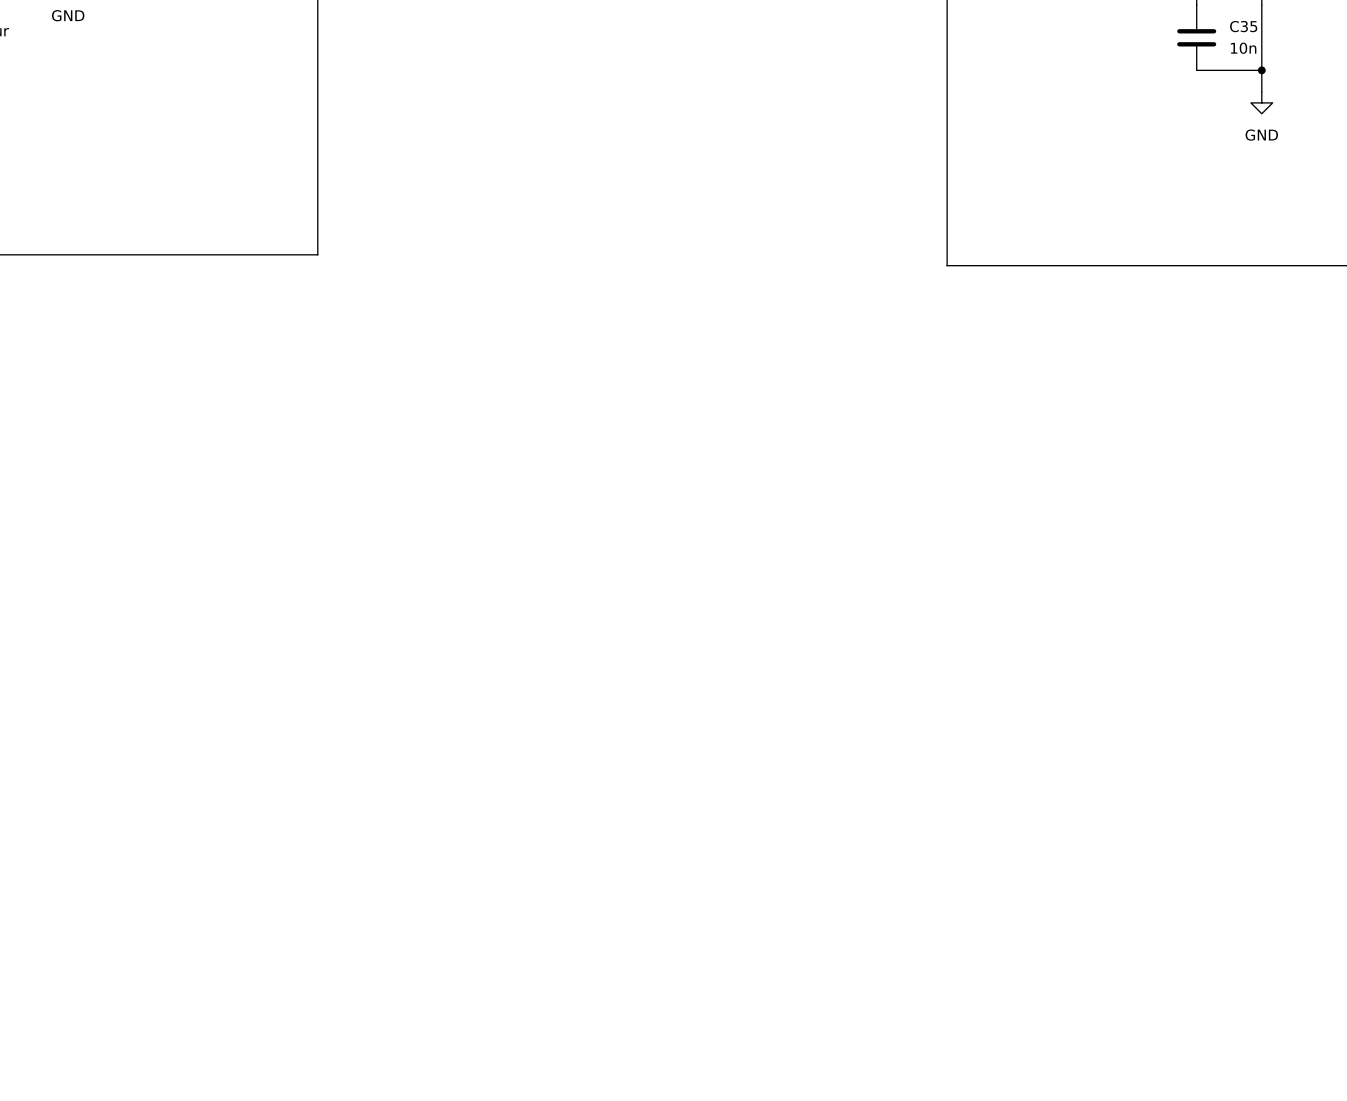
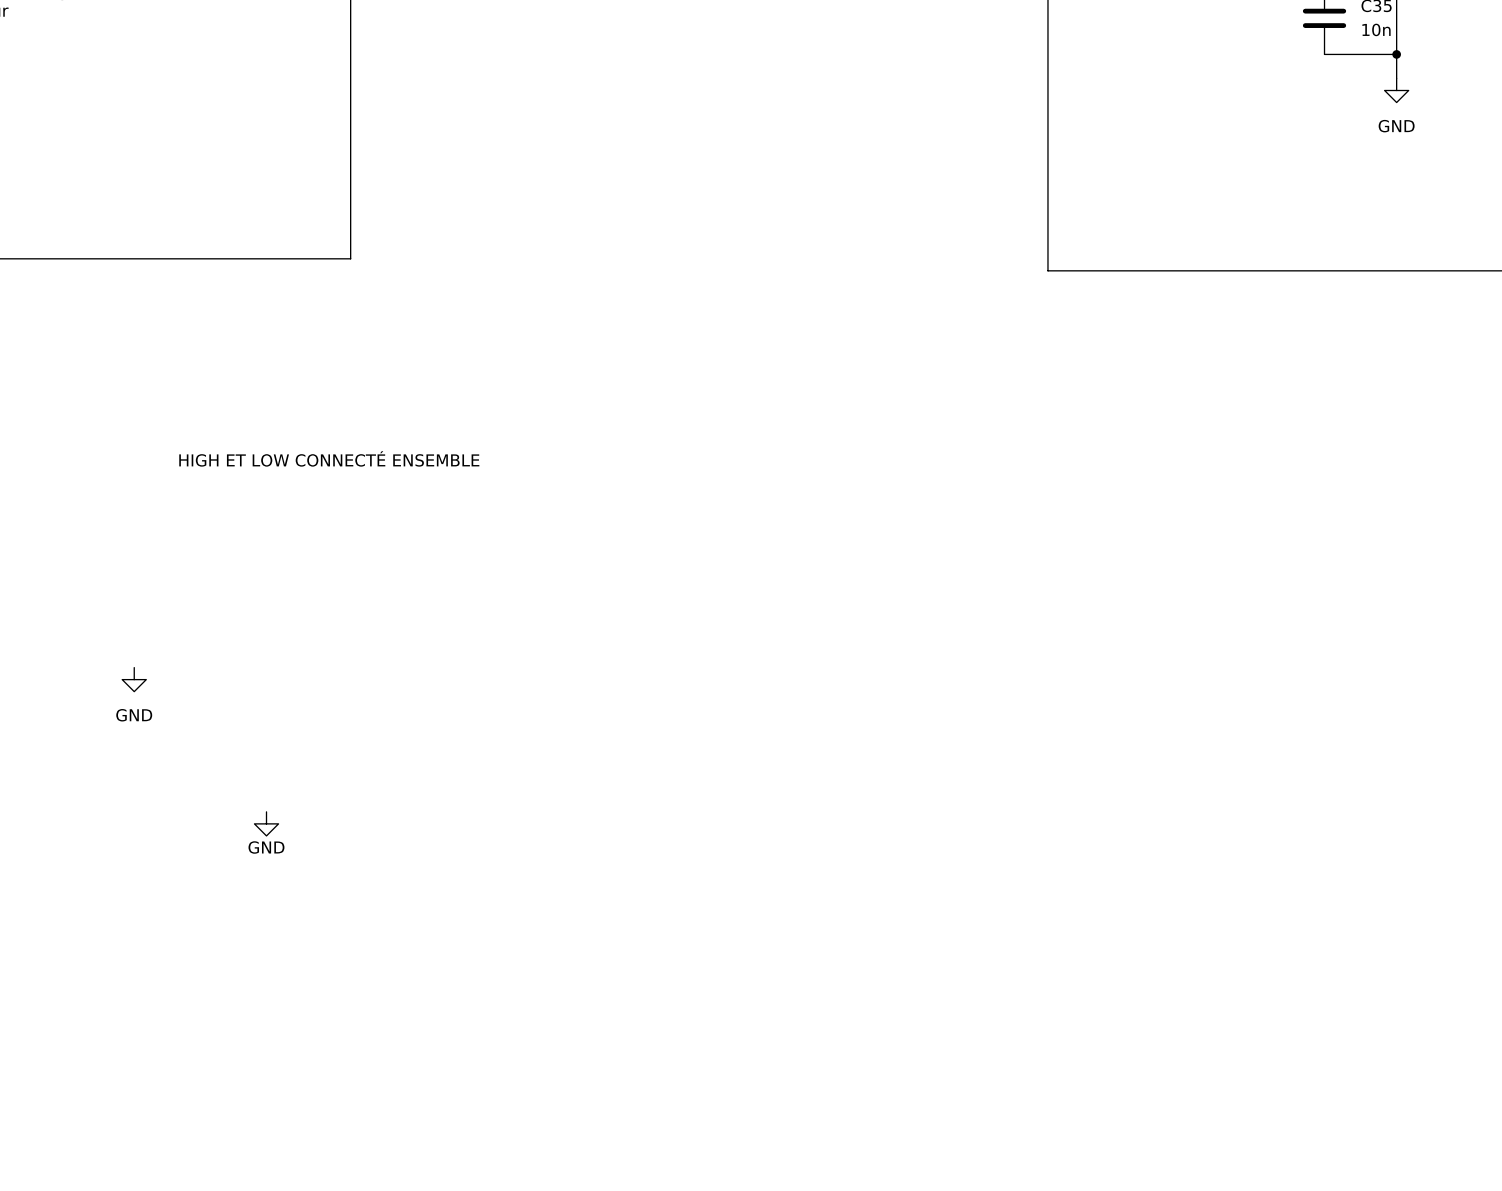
text: none -> HIGH ET LOW CONNECTÉ ENSEMBLE (329, 458)
power symbol: none -> GND (134, 679)
power symbol: none -> GND (266, 823)

